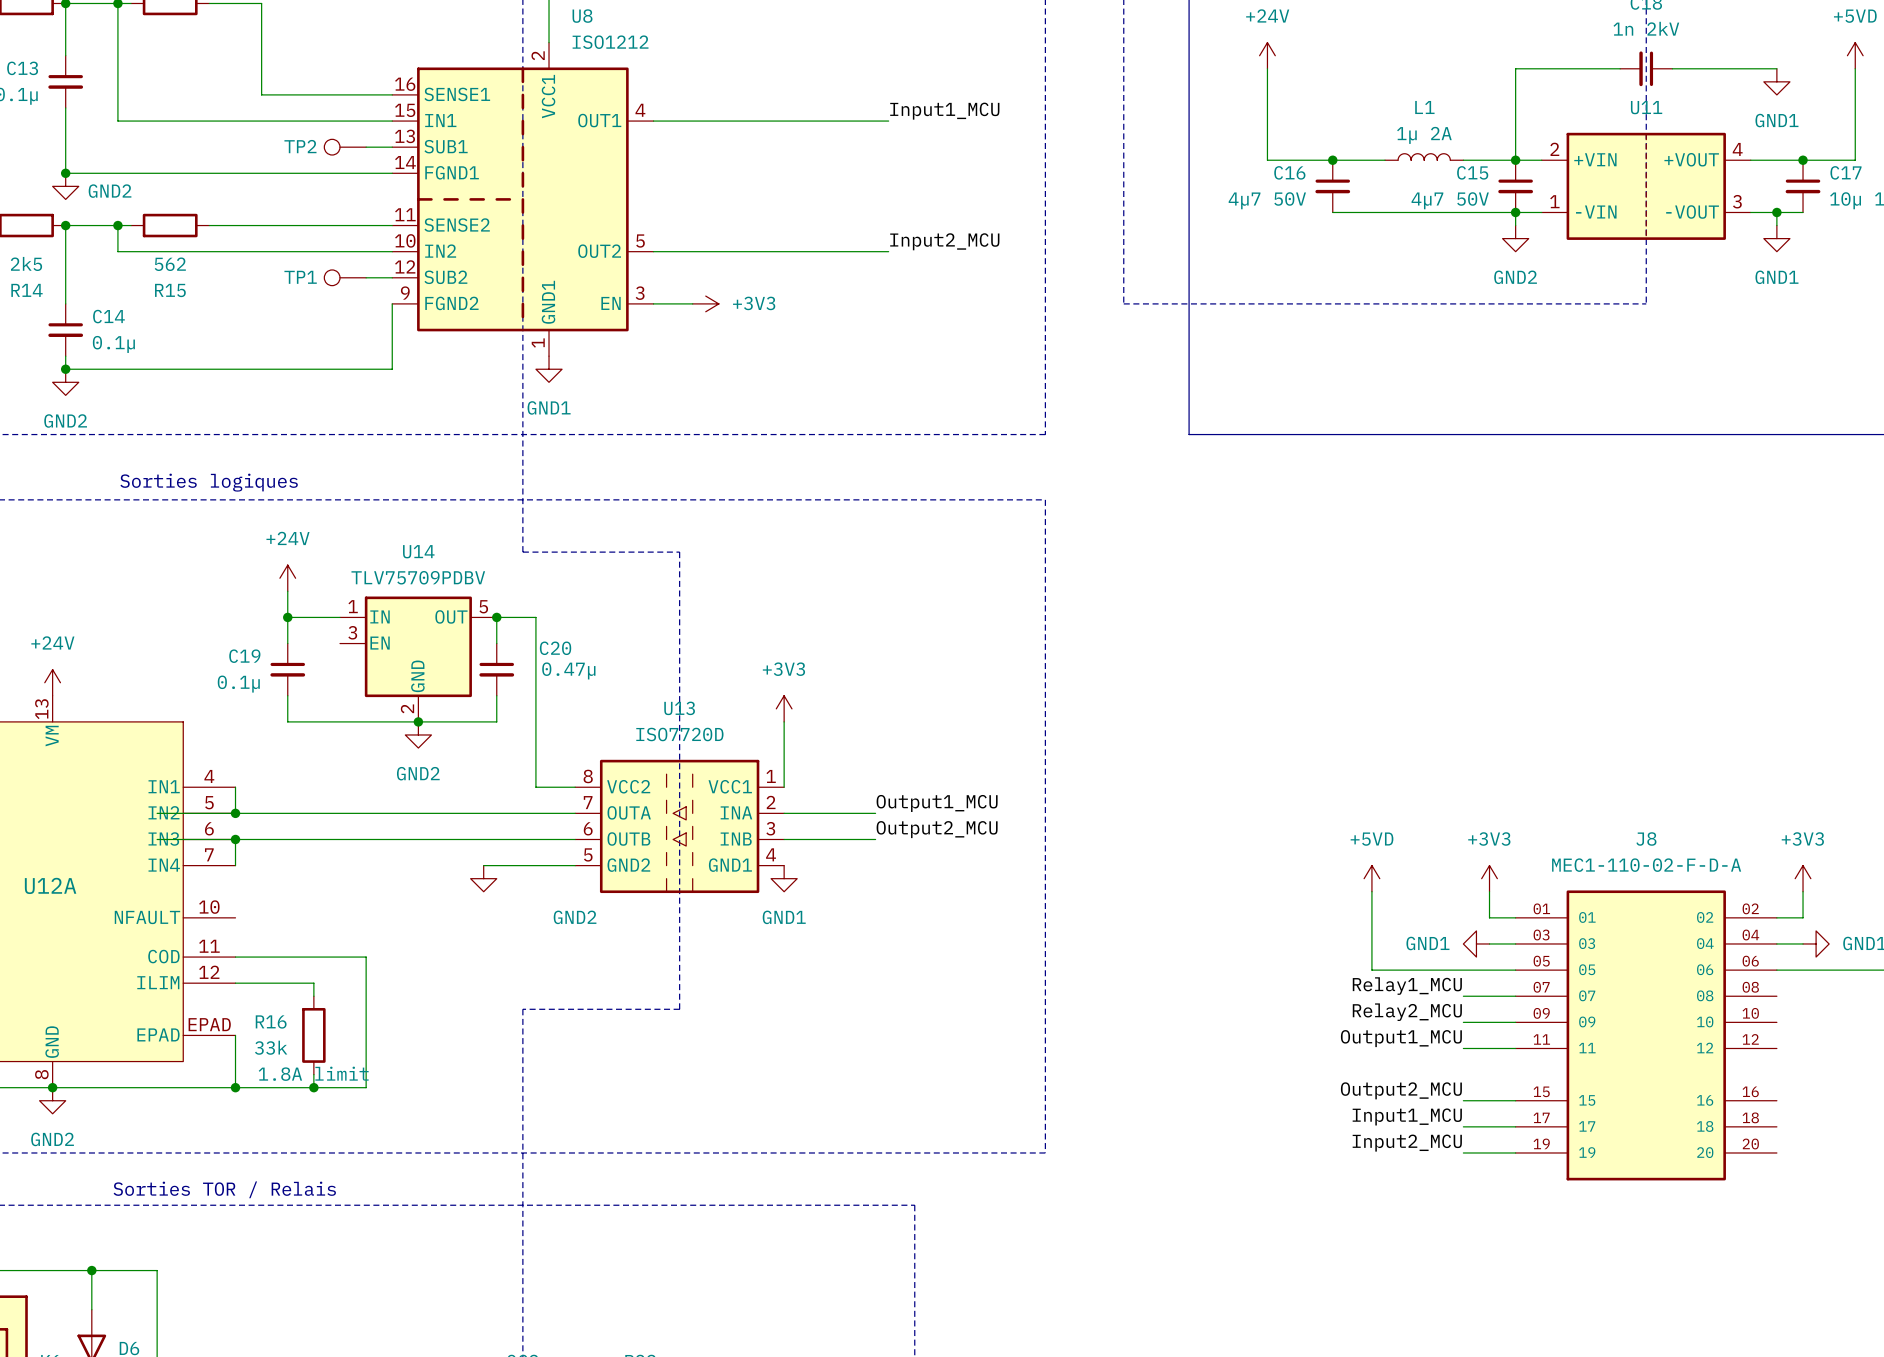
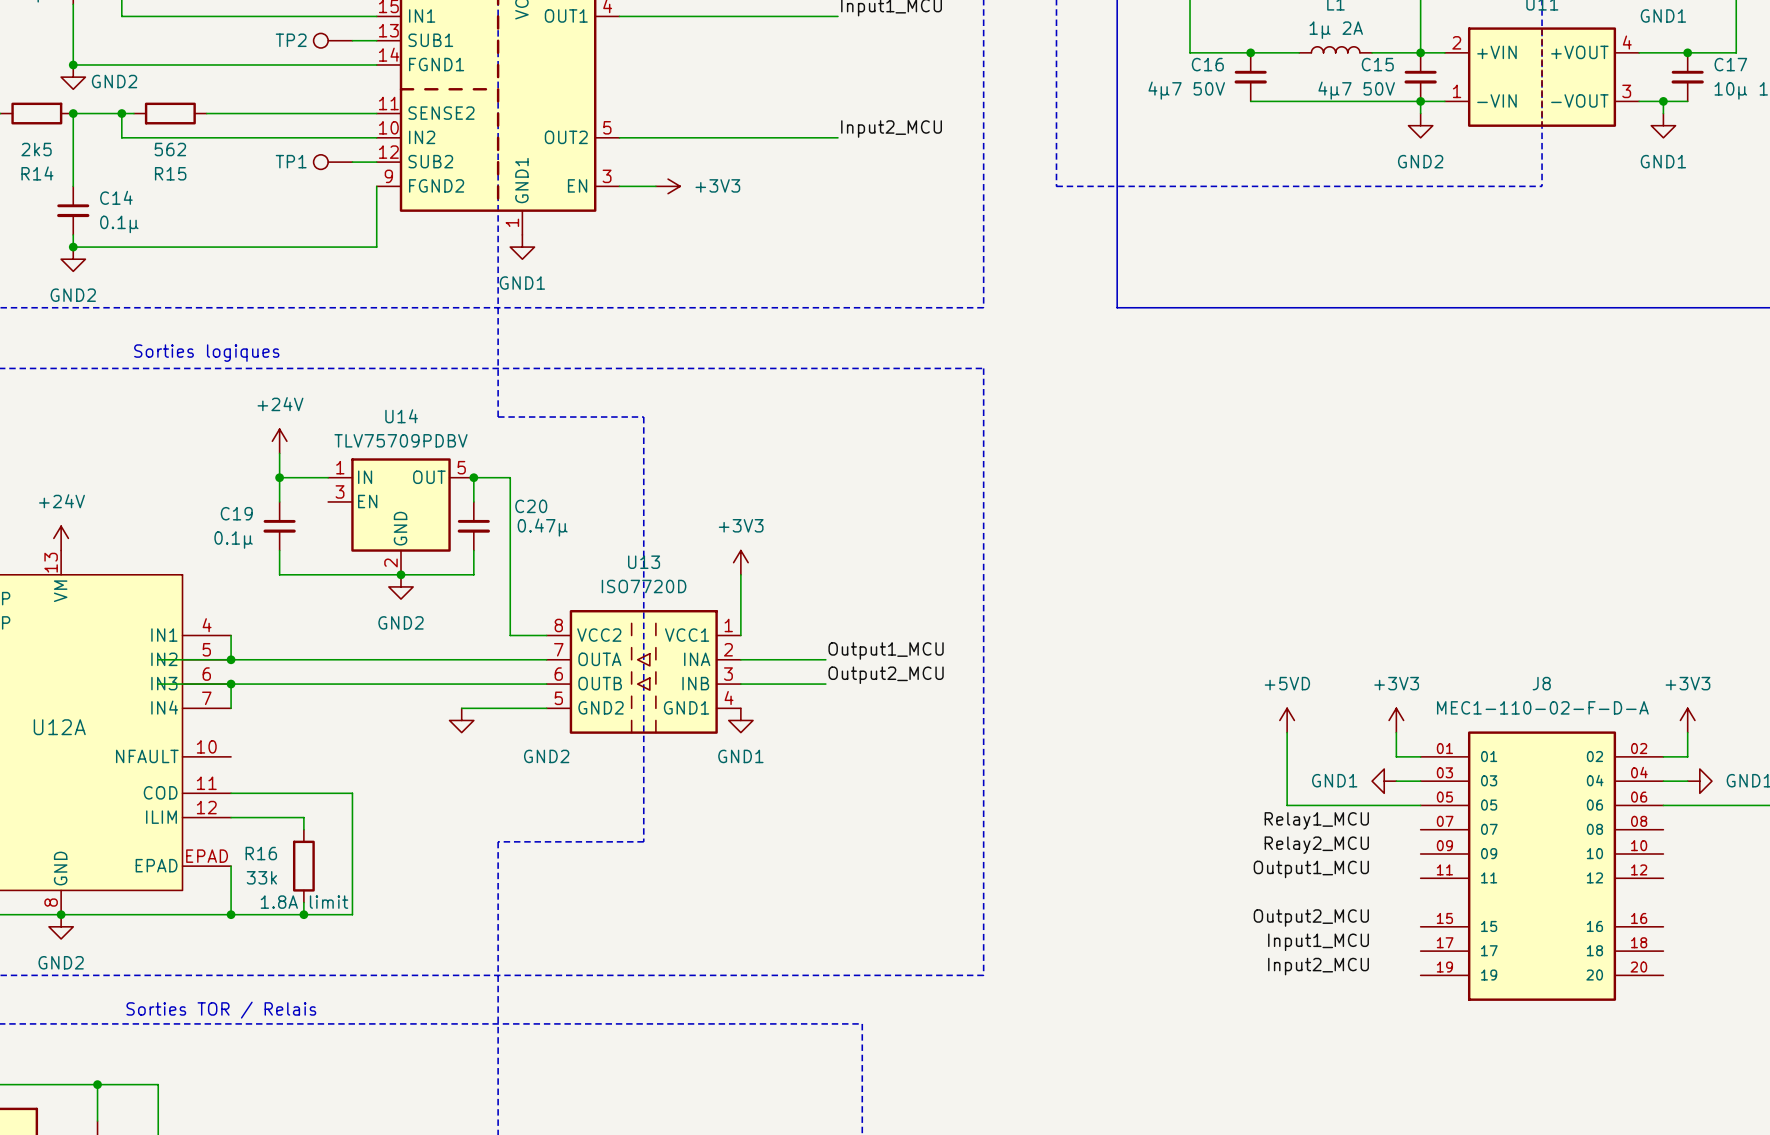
wire: (1463, 996) (1515, 996) -> none
wire: (1463, 1022) (1515, 1022) -> none
wire: (1463, 1048) (1515, 1048) -> none
wire: (1463, 1100) (1515, 1100) -> none
wire: (1463, 1126) (1515, 1126) -> none
wire: (1463, 1152) (1515, 1152) -> none

